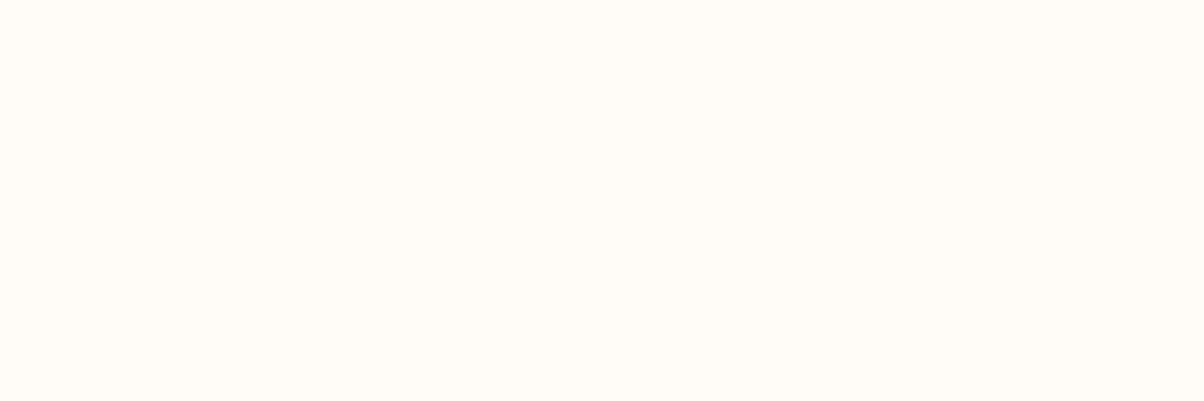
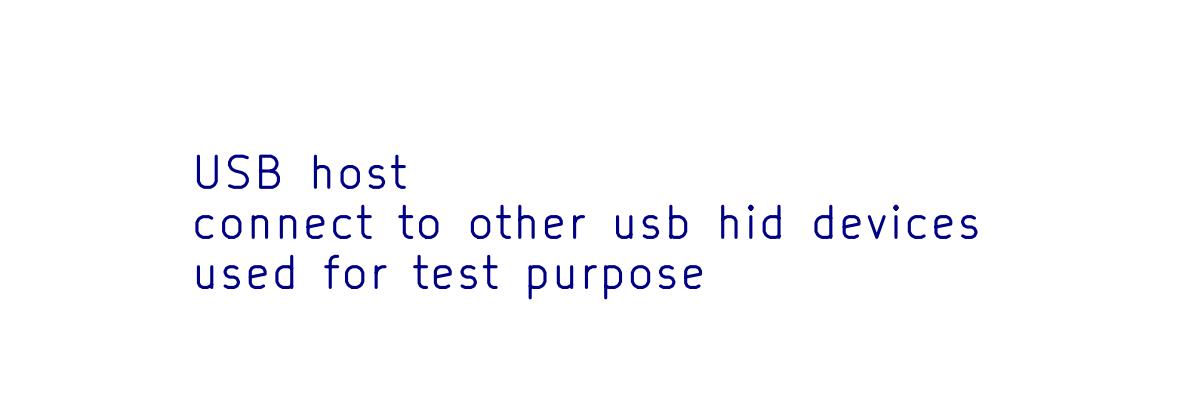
text: none -> USB host (301, 171)
text: none -> connect to other usb hid devices (586, 221)
text: none -> used for test purpose (449, 277)

